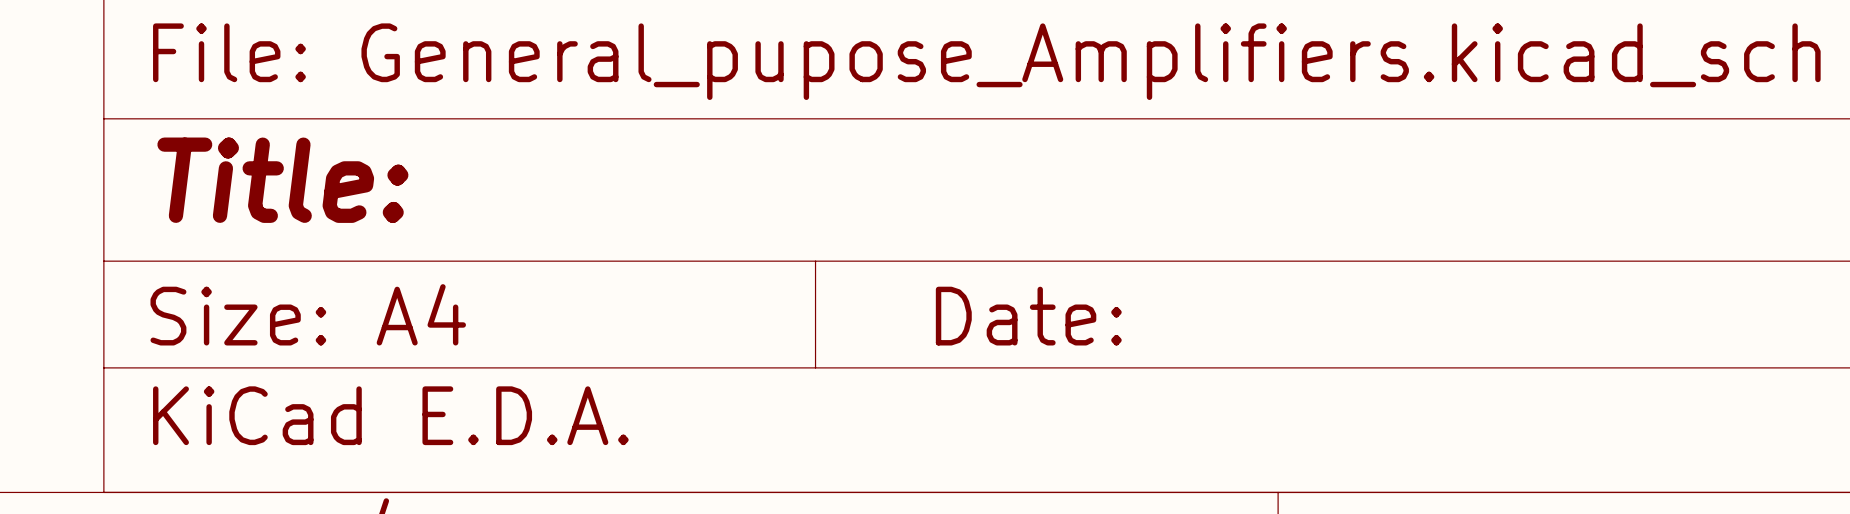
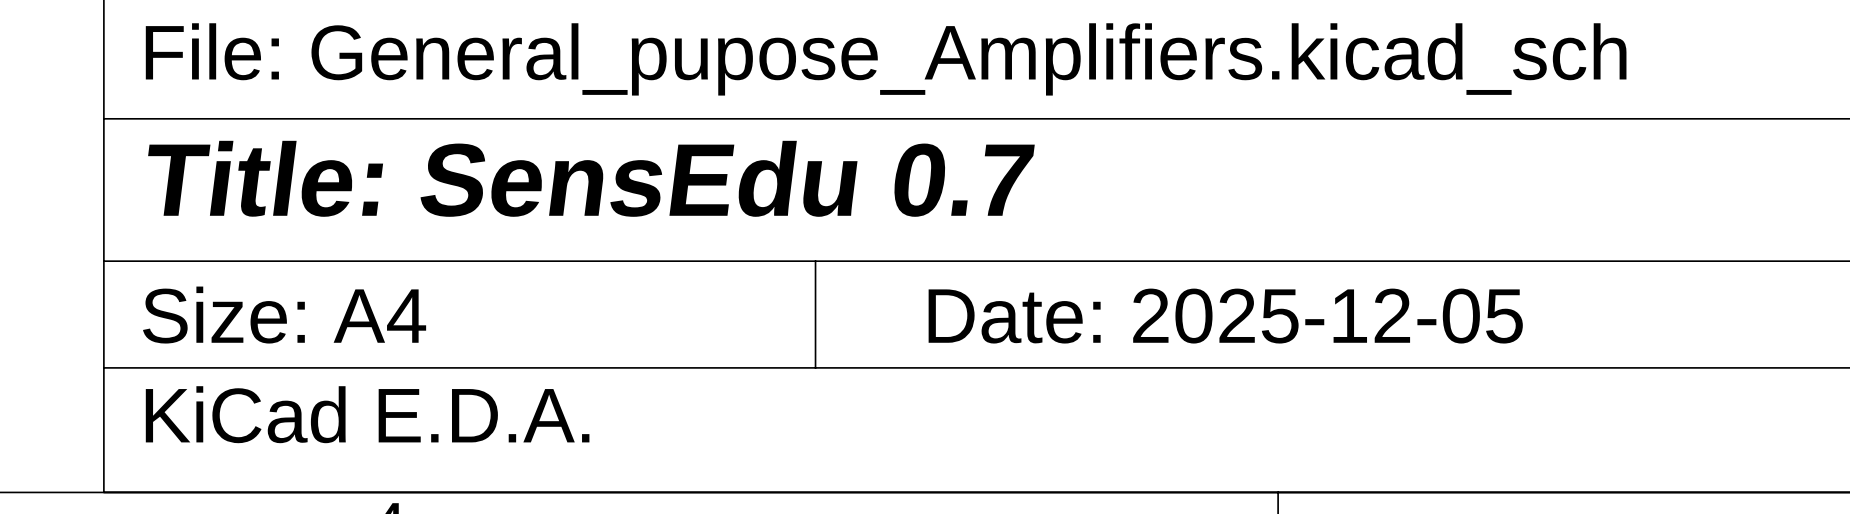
title block: Title: (282, 180) -> Title: SensEdu 0.7 (591, 178)
title block: Date: (1028, 316) -> Date: 2025-12-05 (1225, 316)

